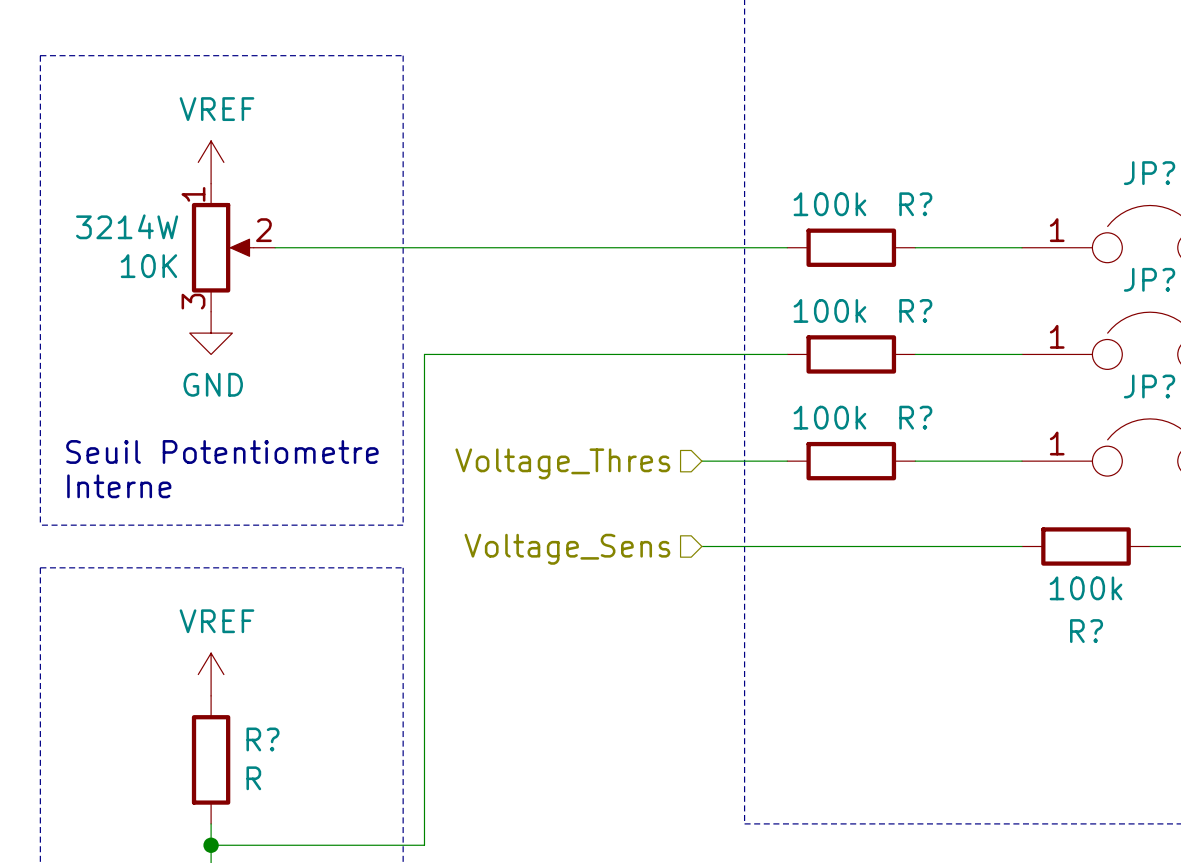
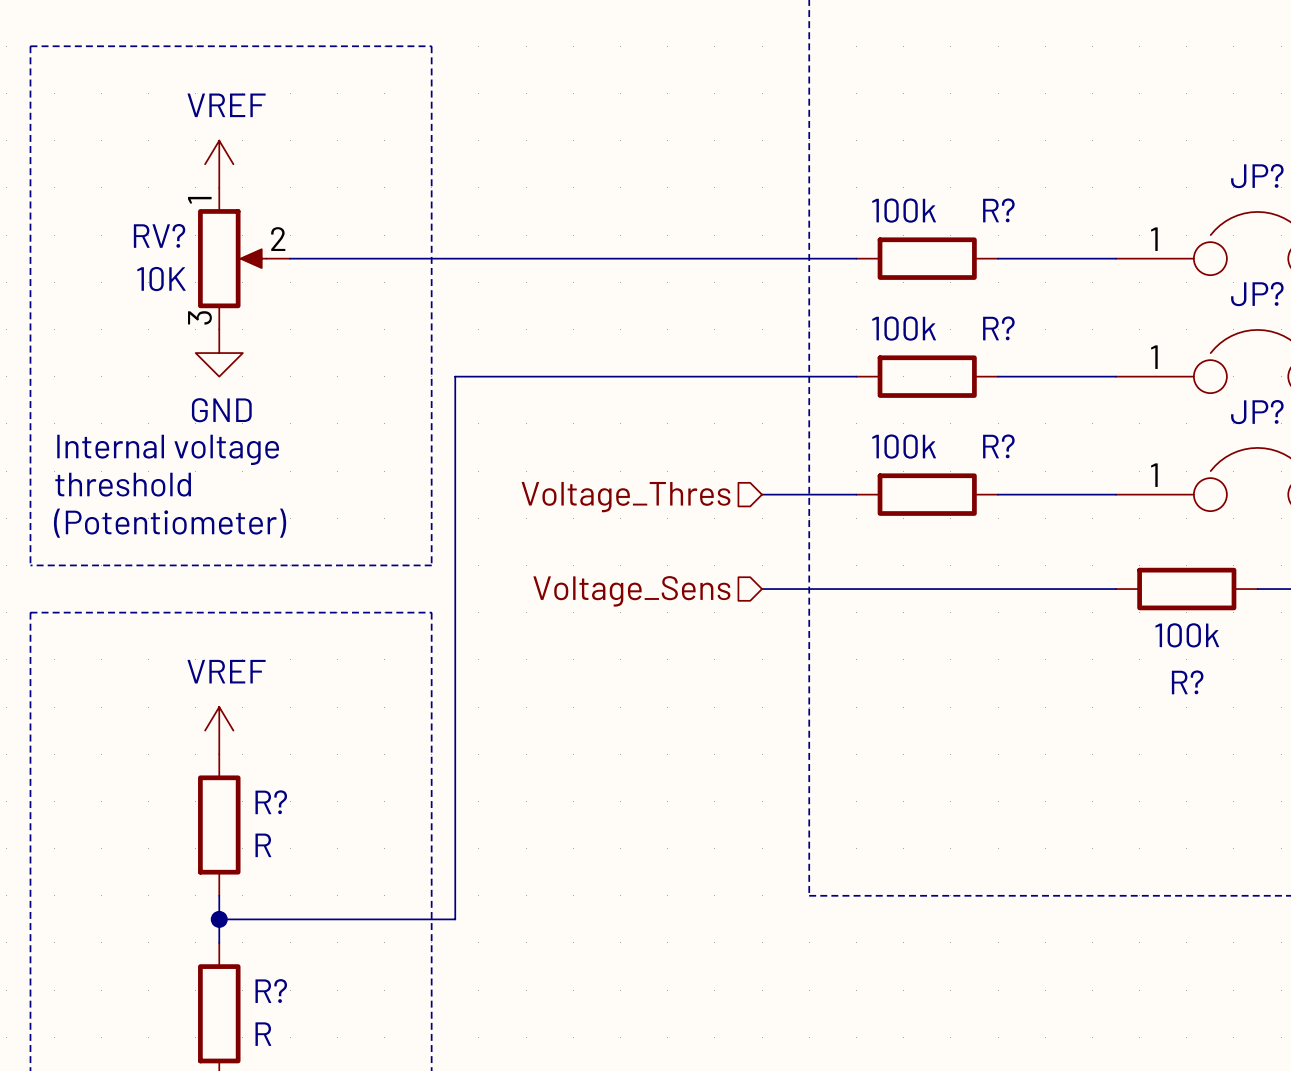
3214W name: 3214W (127, 226) -> RV? (159, 235)
text: none -> Internal voltage (168, 449)
text: Seuil Potentiometre (222, 451) -> threshold (123, 484)
text: Interne (119, 486) -> (Potentiometer) (170, 523)

